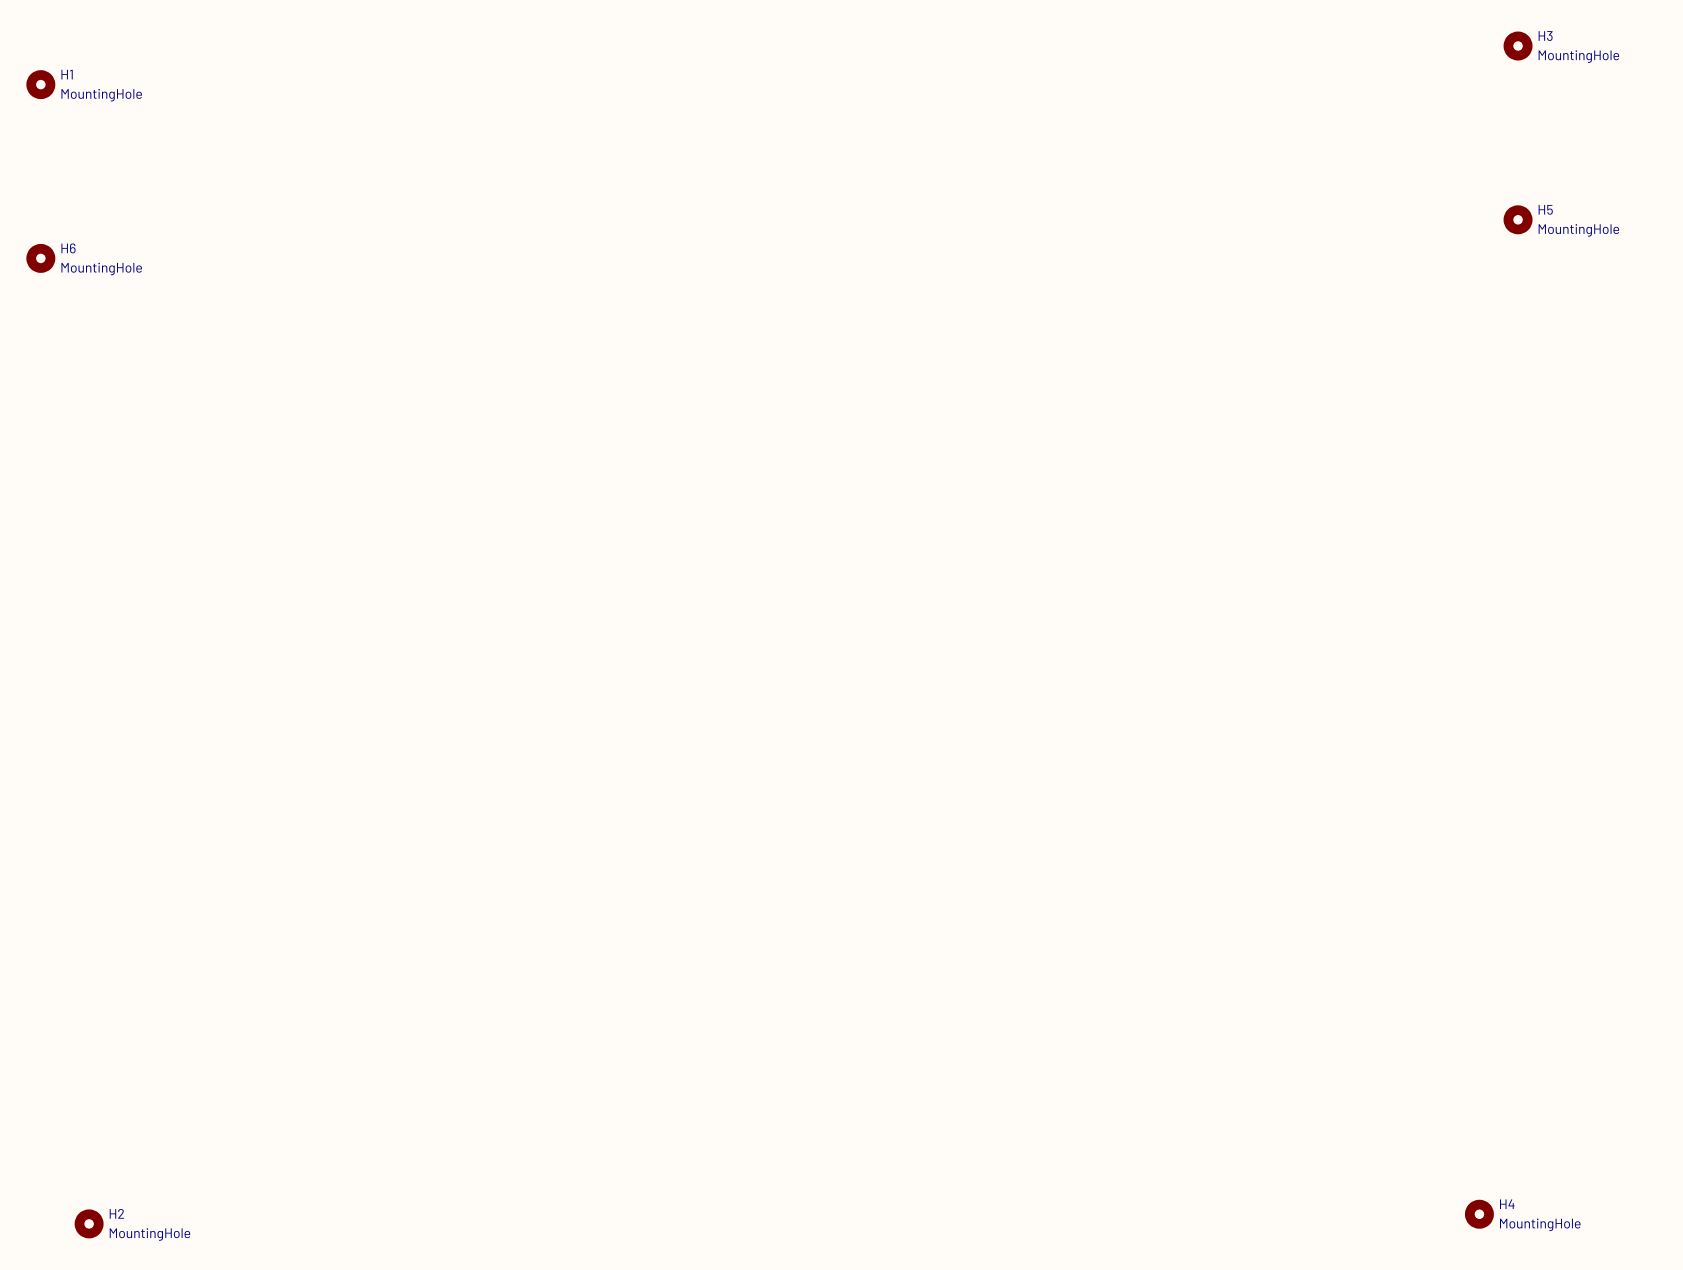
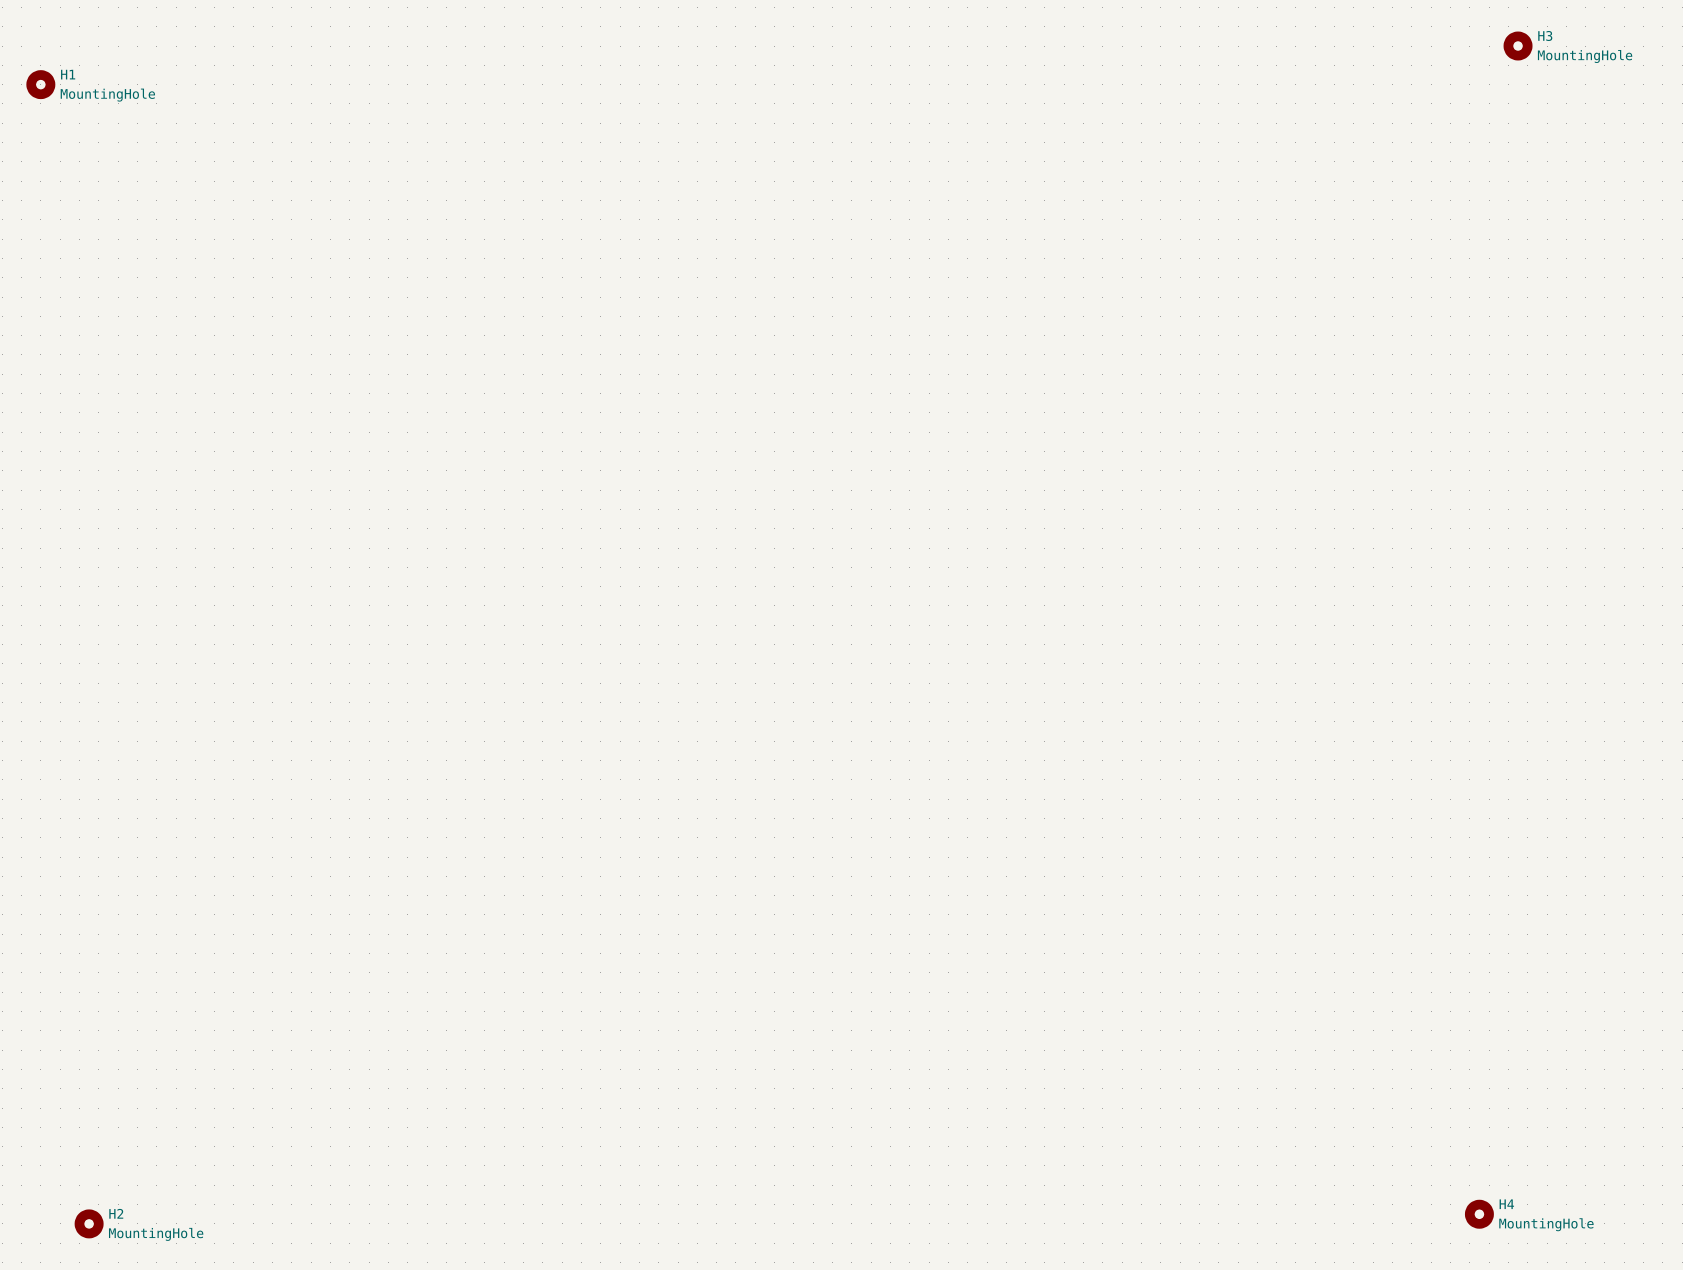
H5: MountingHole (1518, 219) -> none
H6: MountingHole (40, 258) -> none

